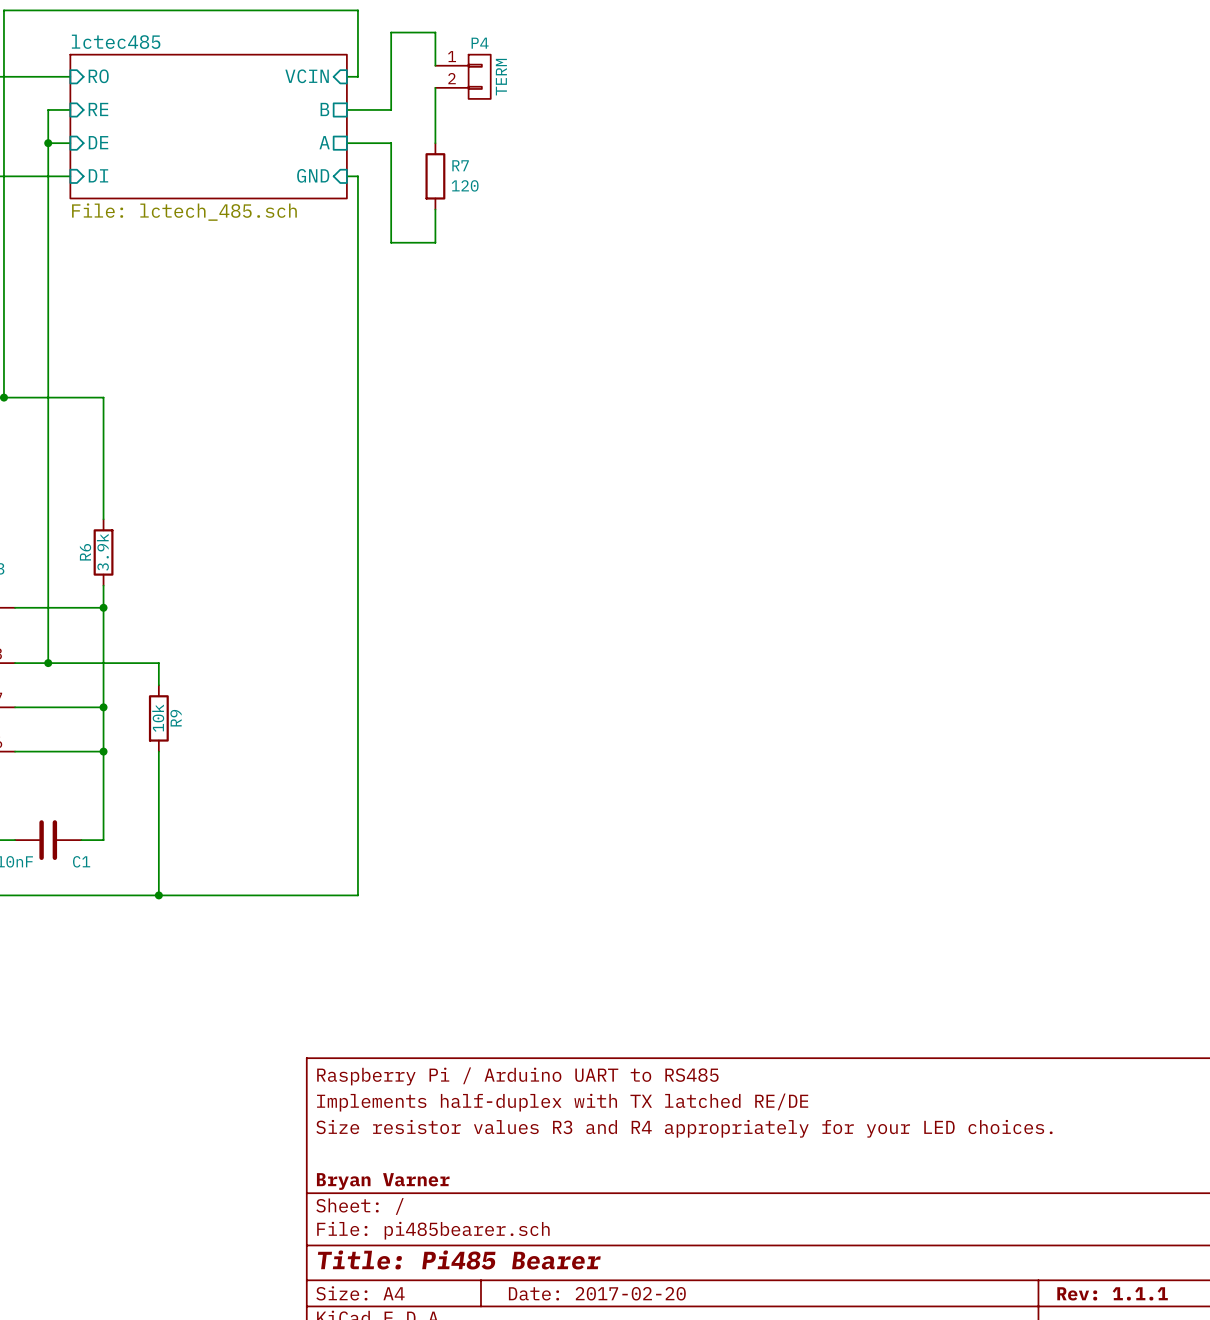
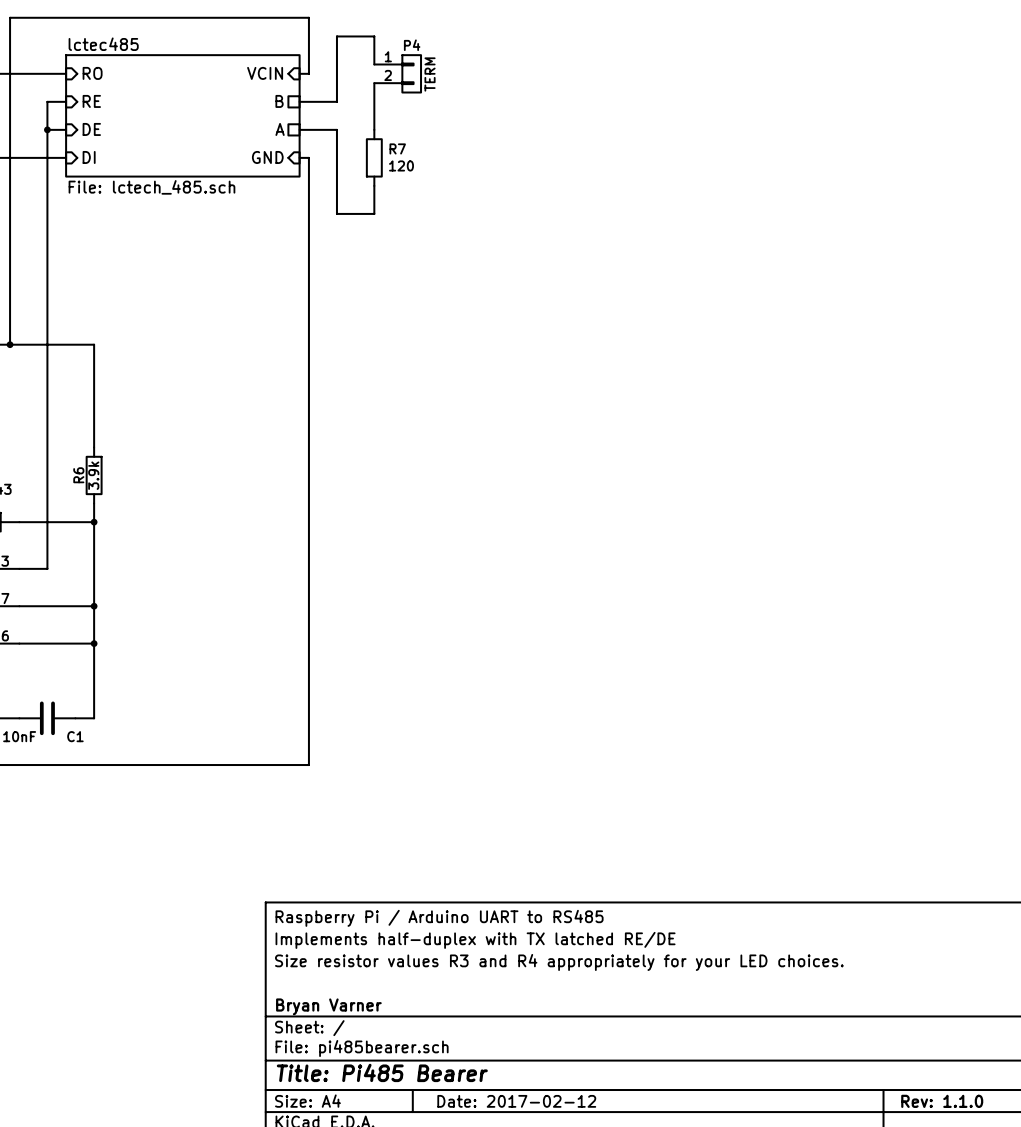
wire: (48, 663) (158, 663) (158, 685) -> none
junction: (48, 663) -> none
R9: 10k (158, 718) -> none
wire: (158, 751) (158, 895) -> none
junction: (158, 895) -> none
title block: Date: 2017-02-20 (597, 1293) -> Date: 2017-02-12 (516, 1101)
title block: Rev: 1.1.1 (1112, 1293) -> Rev: 1.1.0 (942, 1101)

